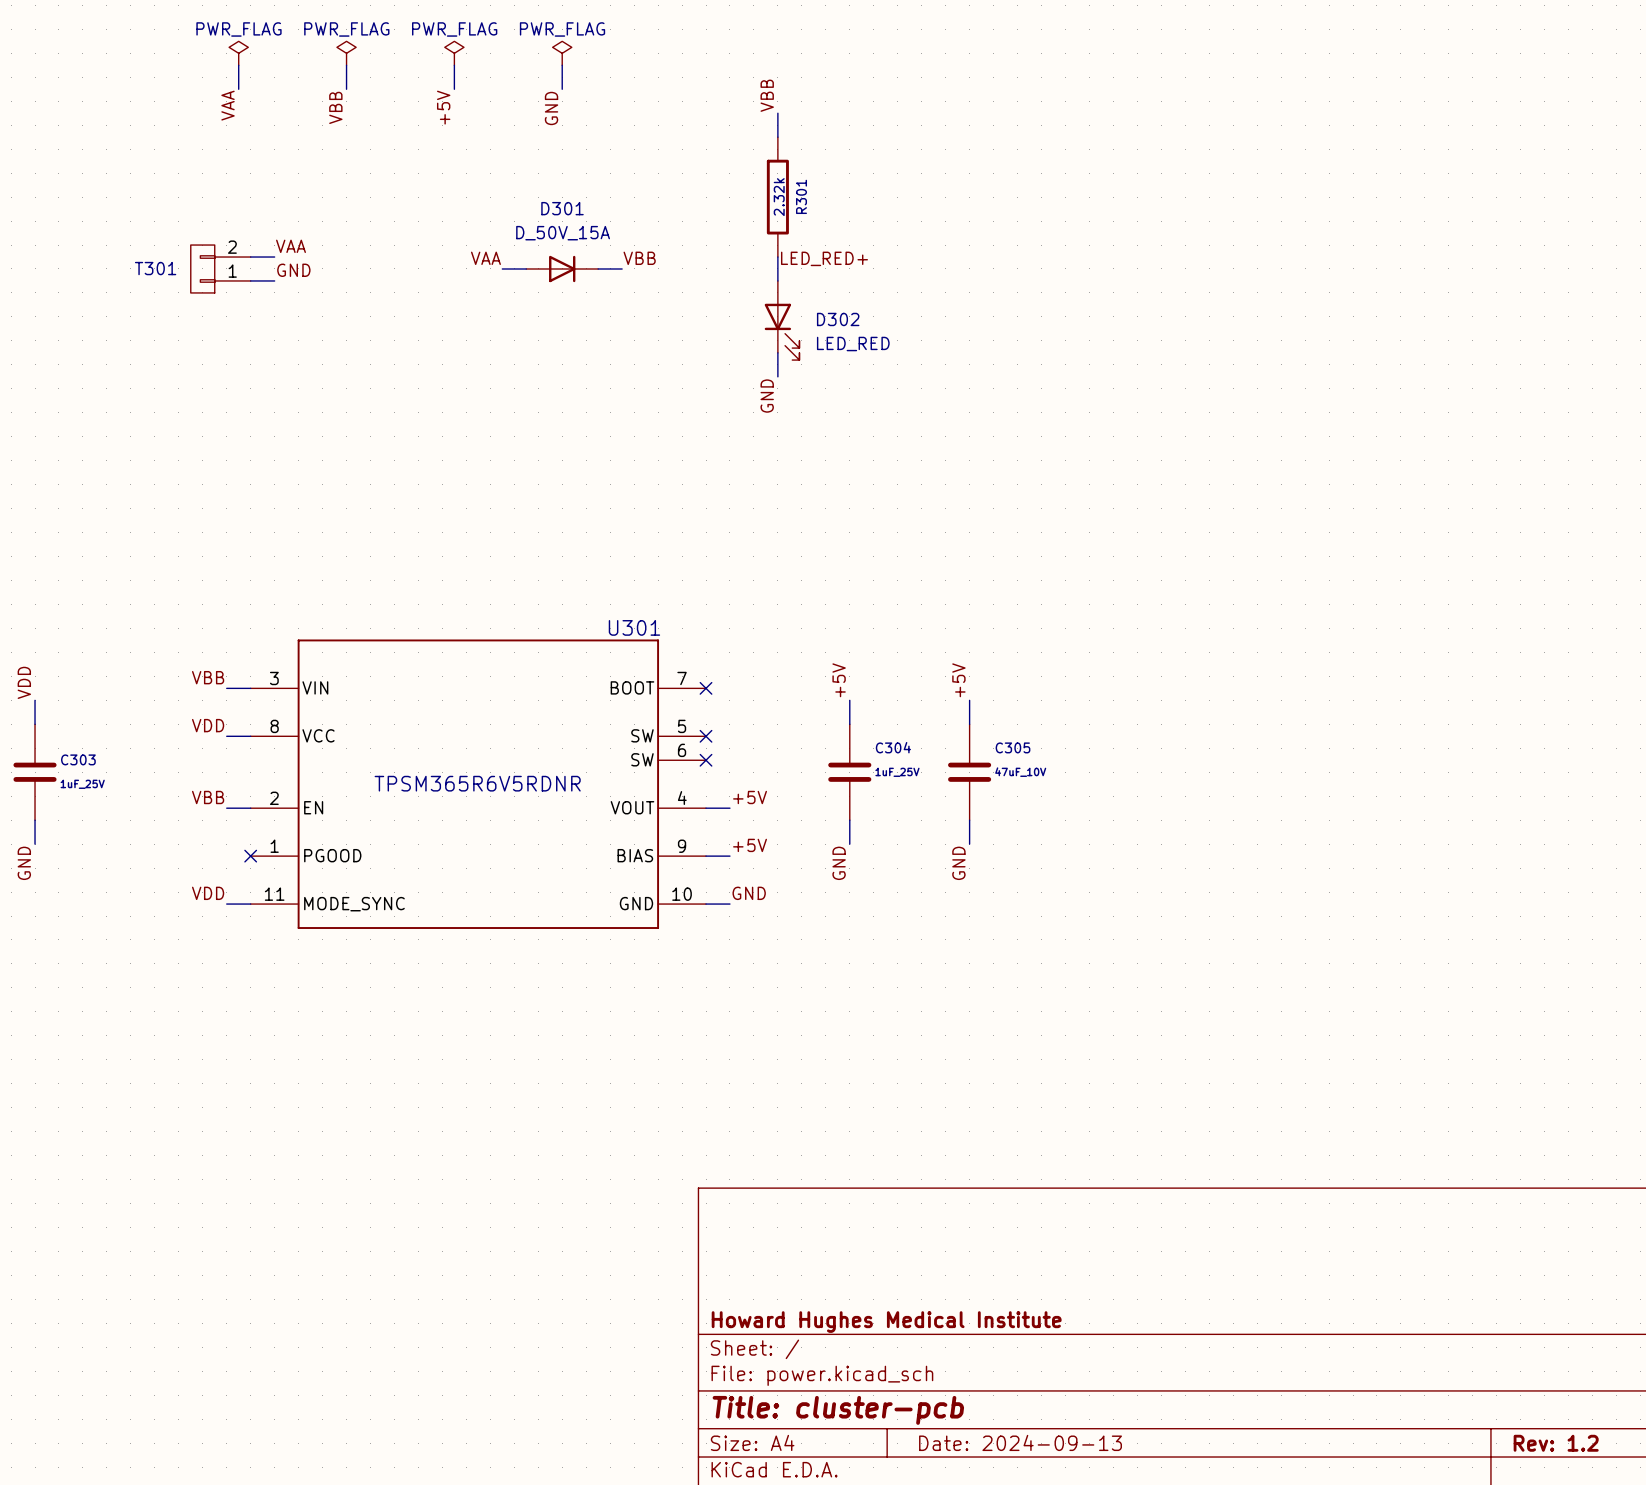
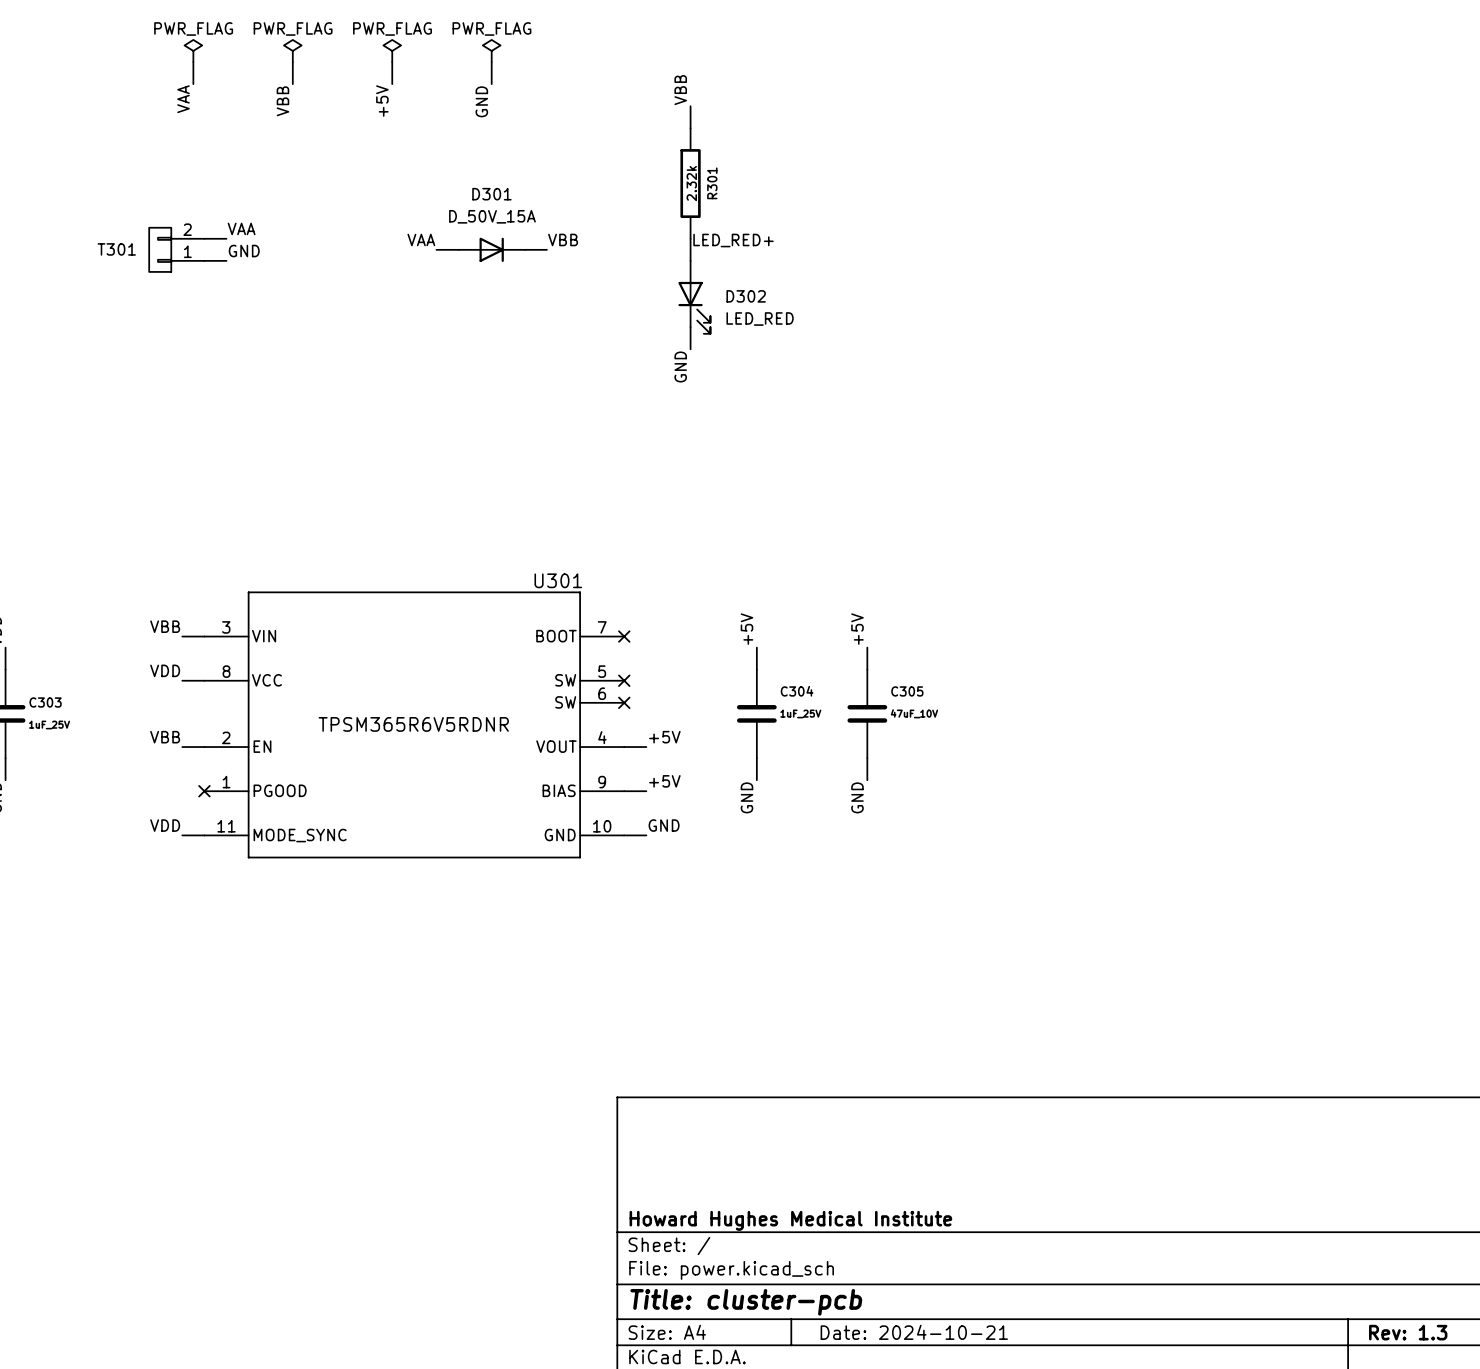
title block: Date: 2024-09-13 (1020, 1442) -> Date: 2024-10-21 (914, 1332)
title block: Rev: 1.2 (1556, 1443) -> Rev: 1.3 (1408, 1332)

